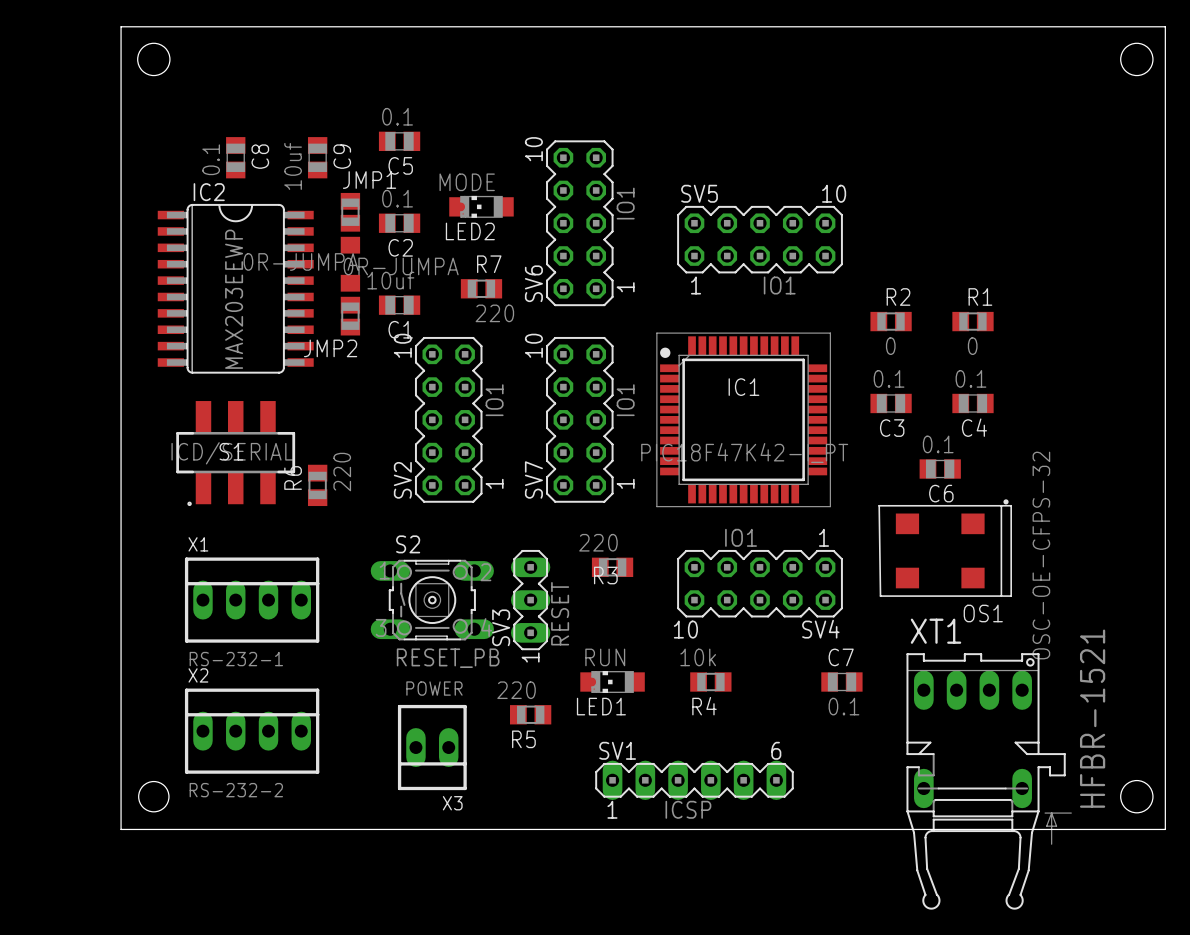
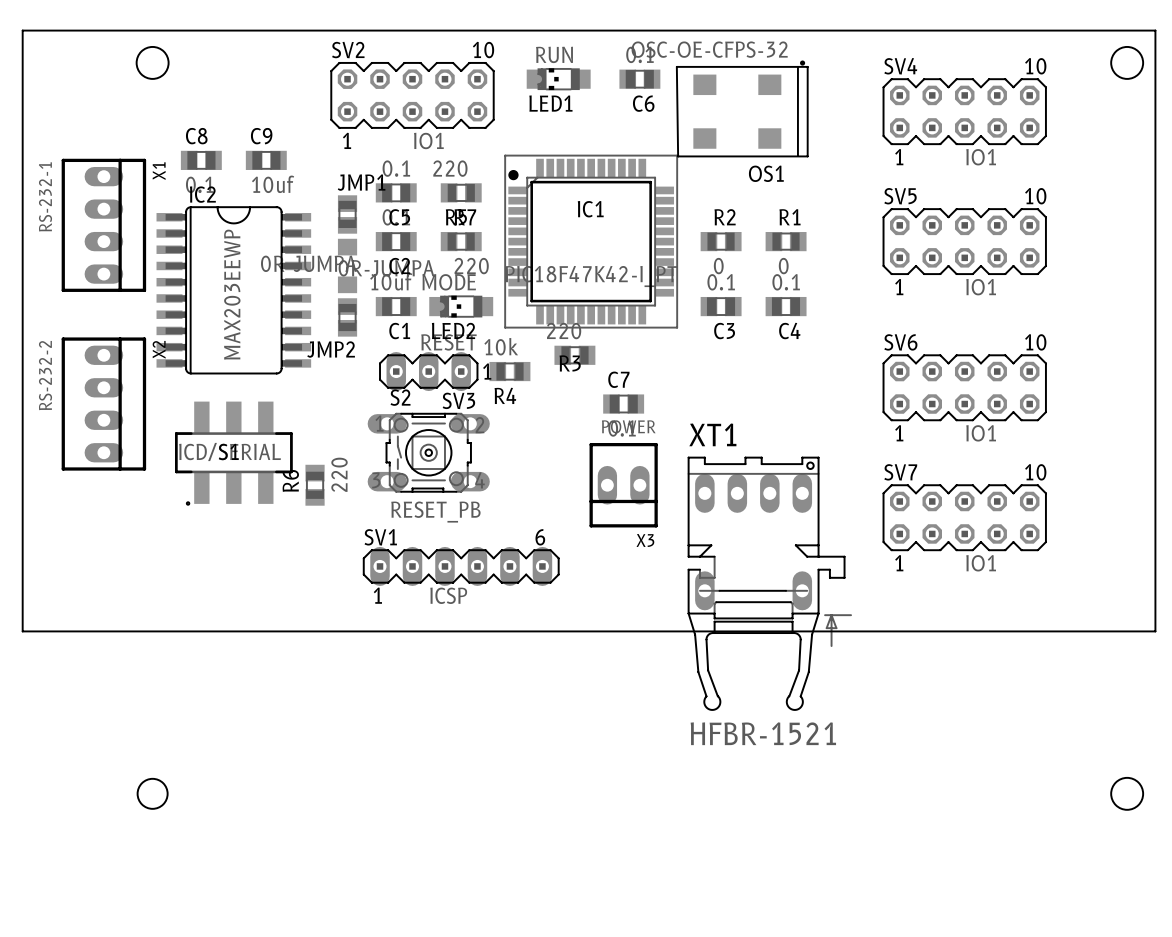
board edge: (121, 26) (121, 829) (1165, 829) (1165, 632) -> (120, 30) (22, 30) (22, 631) (1155, 631)
C5 position: (399, 141) -> (396, 192)
C8 name position: C8 (260, 156) -> C8 (196, 136)
C9 name position: C9 (342, 156) -> C9 (261, 136)
C8 rotation: 0° (235, 157) -> 90° clockwise (201, 160)
C8 position: (235, 157) -> (201, 160)
C9 rotation: 0° (317, 157) -> 90° clockwise (266, 160)
C9 position: (317, 157) -> (266, 160)
C8 value position: 0.1 (211, 159) -> 0.1 (199, 184)
C9 value position: 10uf (293, 166) -> 10uf (273, 184)
LED2 position: (481, 206) -> (461, 306)
C2 position: (399, 223) -> (396, 241)
SV6 rotation: 0° (579, 223) -> 90° clockwise (964, 387)
SV6 position: (579, 223) -> (964, 387)
SV5 position: (760, 239) -> (964, 241)
R7 position: (481, 288) -> (461, 241)
R2 position: (891, 321) -> (721, 241)
R1 position: (973, 321) -> (786, 241)
C3 position: (891, 403) -> (721, 306)
C4 position: (973, 403) -> (786, 306)
SV2 rotation: 0° (448, 419) -> 90° clockwise (412, 95)
SV2 position: (448, 419) -> (412, 95)
SV7 rotation: 0° (579, 419) -> 90° clockwise (964, 517)
SV7 position: (579, 419) -> (964, 517)
IC1 position: (743, 419) -> (591, 241)
C6 position: (940, 469) -> (639, 79)
SV4 value position: IO1 (741, 537) -> IO1 (981, 157)
SV4 text position: 1 (824, 537) -> 1 (899, 157)
OS1 position: (945, 548) -> (742, 108)
SV3 footprint: [510, 549, 551, 651] -> [379, 352, 479, 392]
OS1 value rotation: 0° (1041, 555) -> 90° clockwise (709, 49)
R3 position: (612, 567) -> (574, 355)
SV4 position: (760, 583) -> (964, 111)
X1 rotation: 0° (252, 600) -> 90° clockwise (103, 225)
X1 position: (252, 600) -> (103, 225)
S2 position: (432, 600) -> (428, 452)
SV3 value position: RESET (560, 613) -> RESET (448, 342)
OS1 name position: OS1 (983, 613) -> OS1 (766, 173)
SV3 name position: SV3 (501, 627) -> SV3 (458, 400)
SV4 text position: 10 (685, 629) -> 10 (1035, 66)
SV4 name position: SV4 (820, 629) -> SV4 (900, 66)
LED1 position: (612, 682) -> (558, 79)
R4 position: (710, 682) -> (509, 371)
C7 position: (841, 682) -> (623, 404)
R5 position: (530, 714) -> (461, 192)
XT1 value rotation: 0° (1092, 718) -> 90° clockwise (763, 733)
XT1 value position: HFBR-1521 (1092, 718) -> HFBR-1521 (763, 733)
X2 rotation: 0° (252, 731) -> 90° clockwise (103, 404)
X2 position: (252, 731) -> (103, 404)
X3 position: (432, 747) -> (623, 485)
SV1 position: (694, 780) -> (461, 566)
XT1 position: (989, 781) -> (769, 583)

